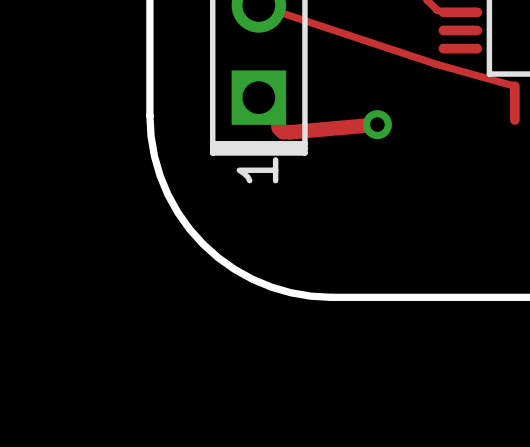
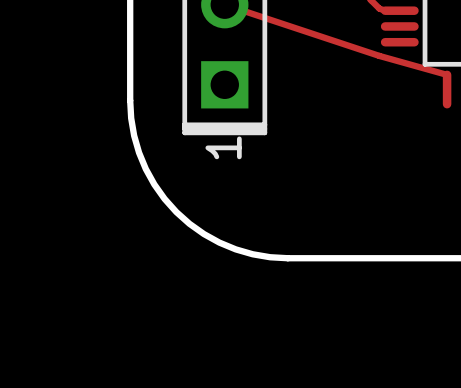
track: (258, 97) (278, 117) (278, 127) (283, 132) (377, 124) -> none
via: (377, 124) -> none

